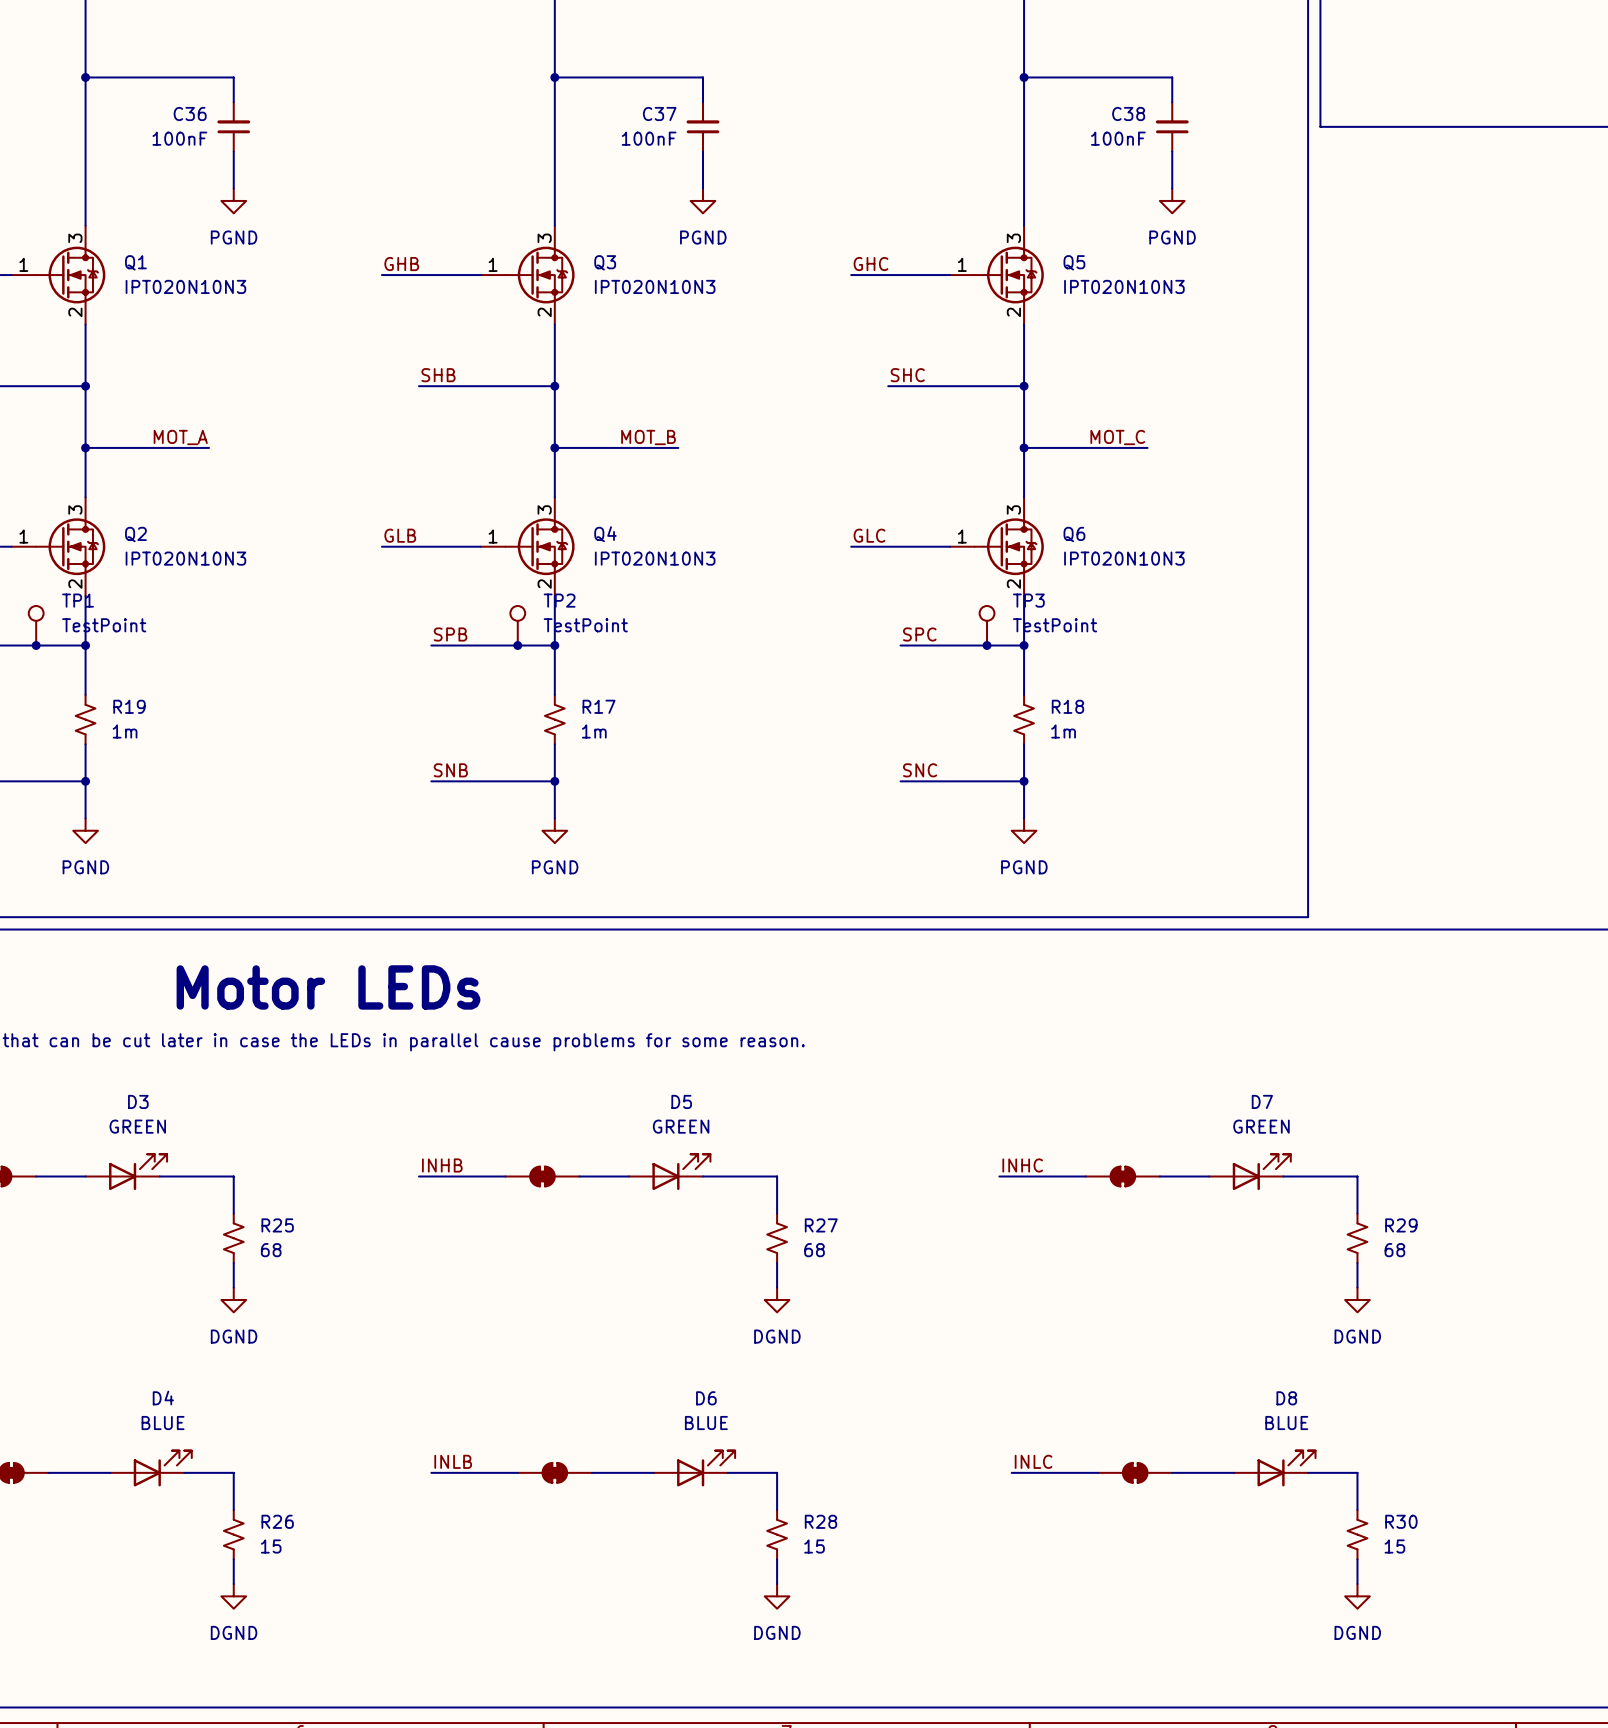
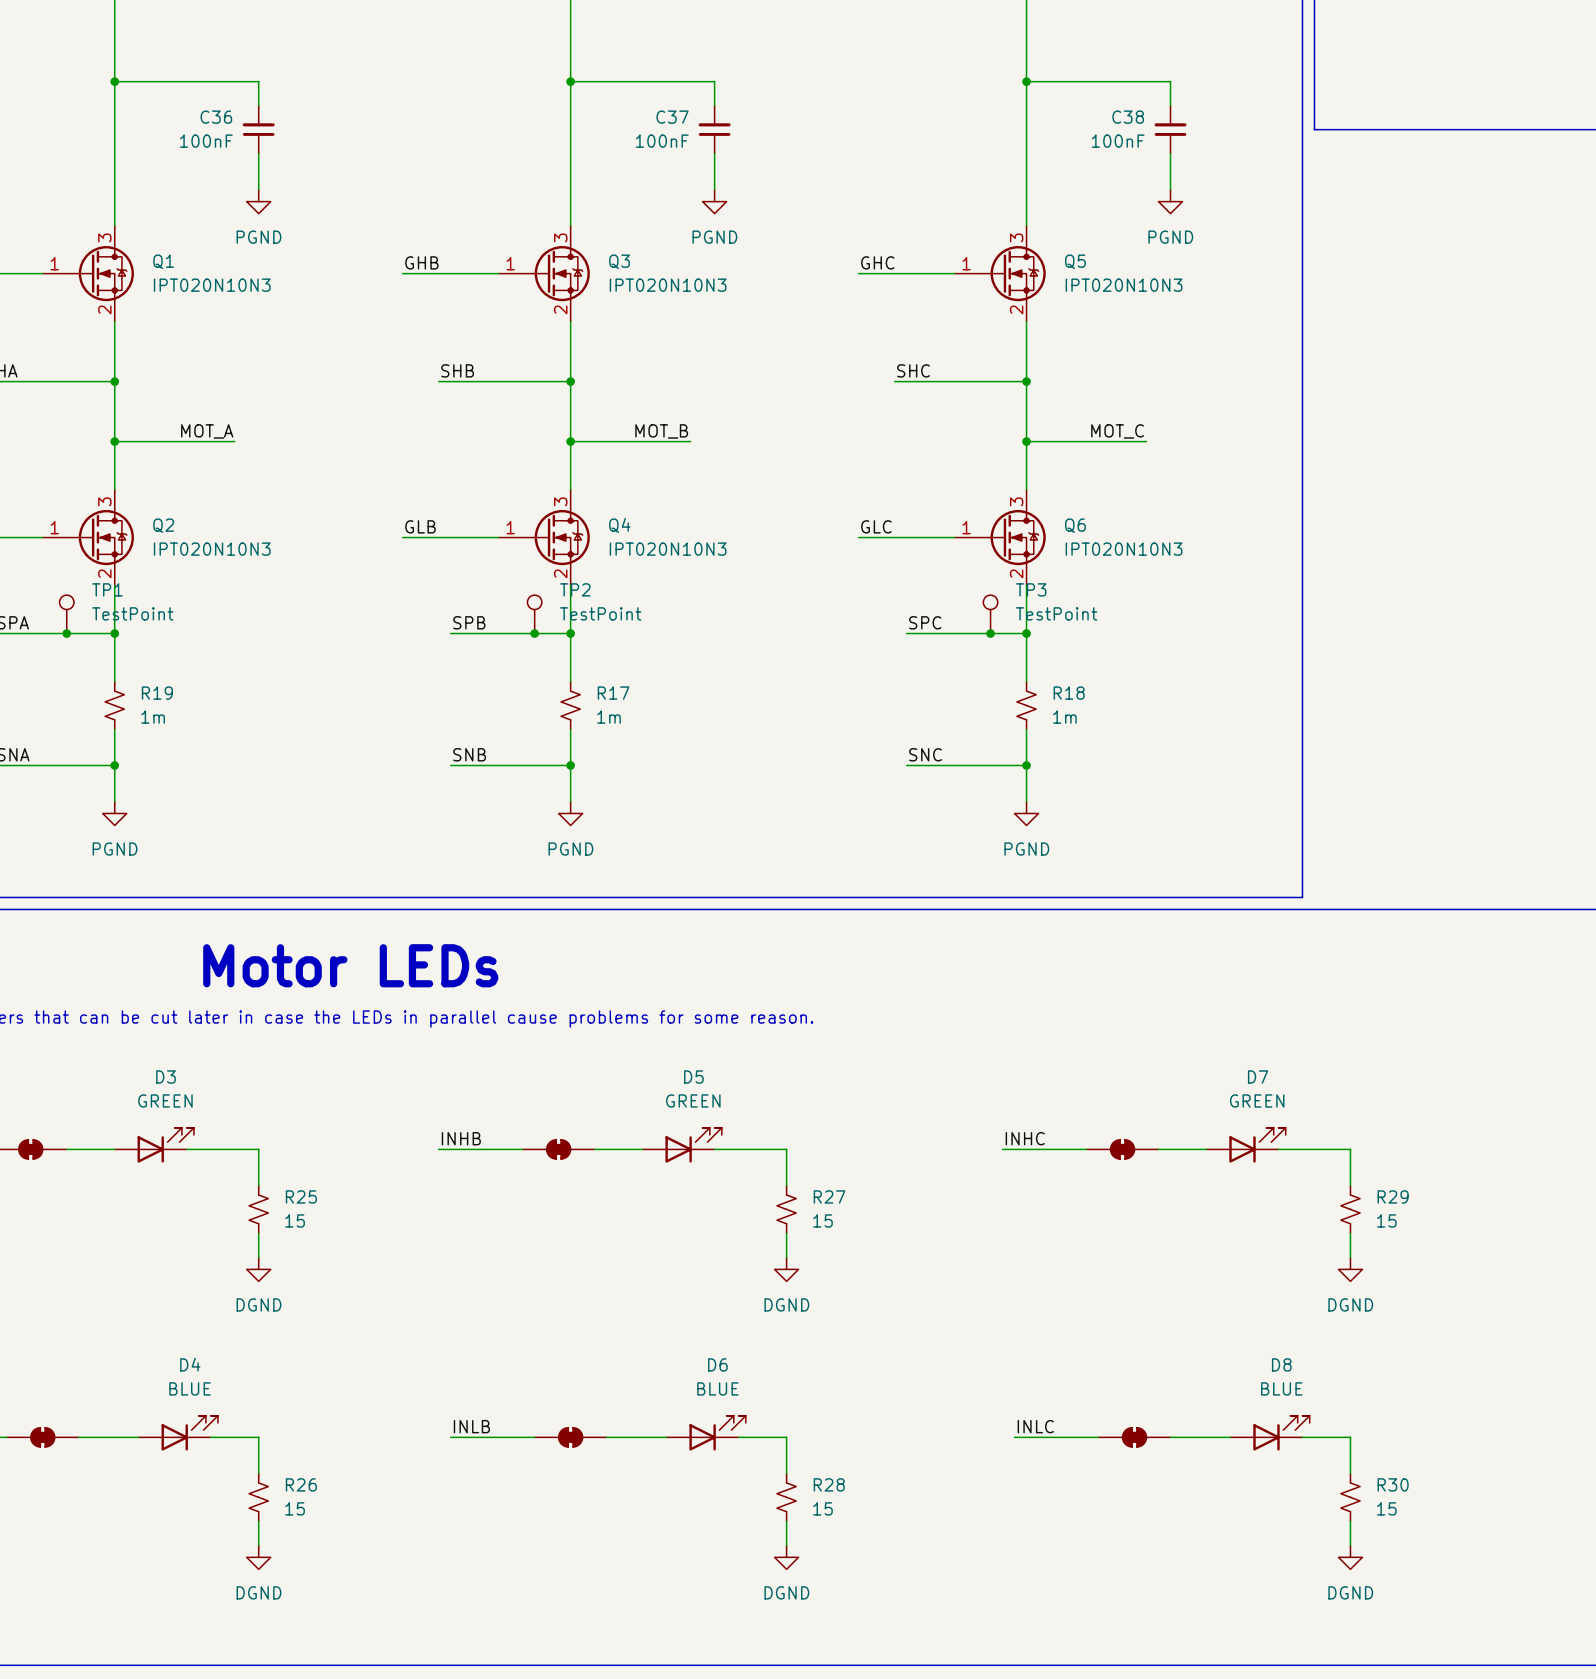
R25 value: 68 (271, 1250) -> 15 (295, 1220)
R27 value: 68 (814, 1250) -> 15 (822, 1220)
R29 value: 68 (1394, 1250) -> 15 (1386, 1220)

